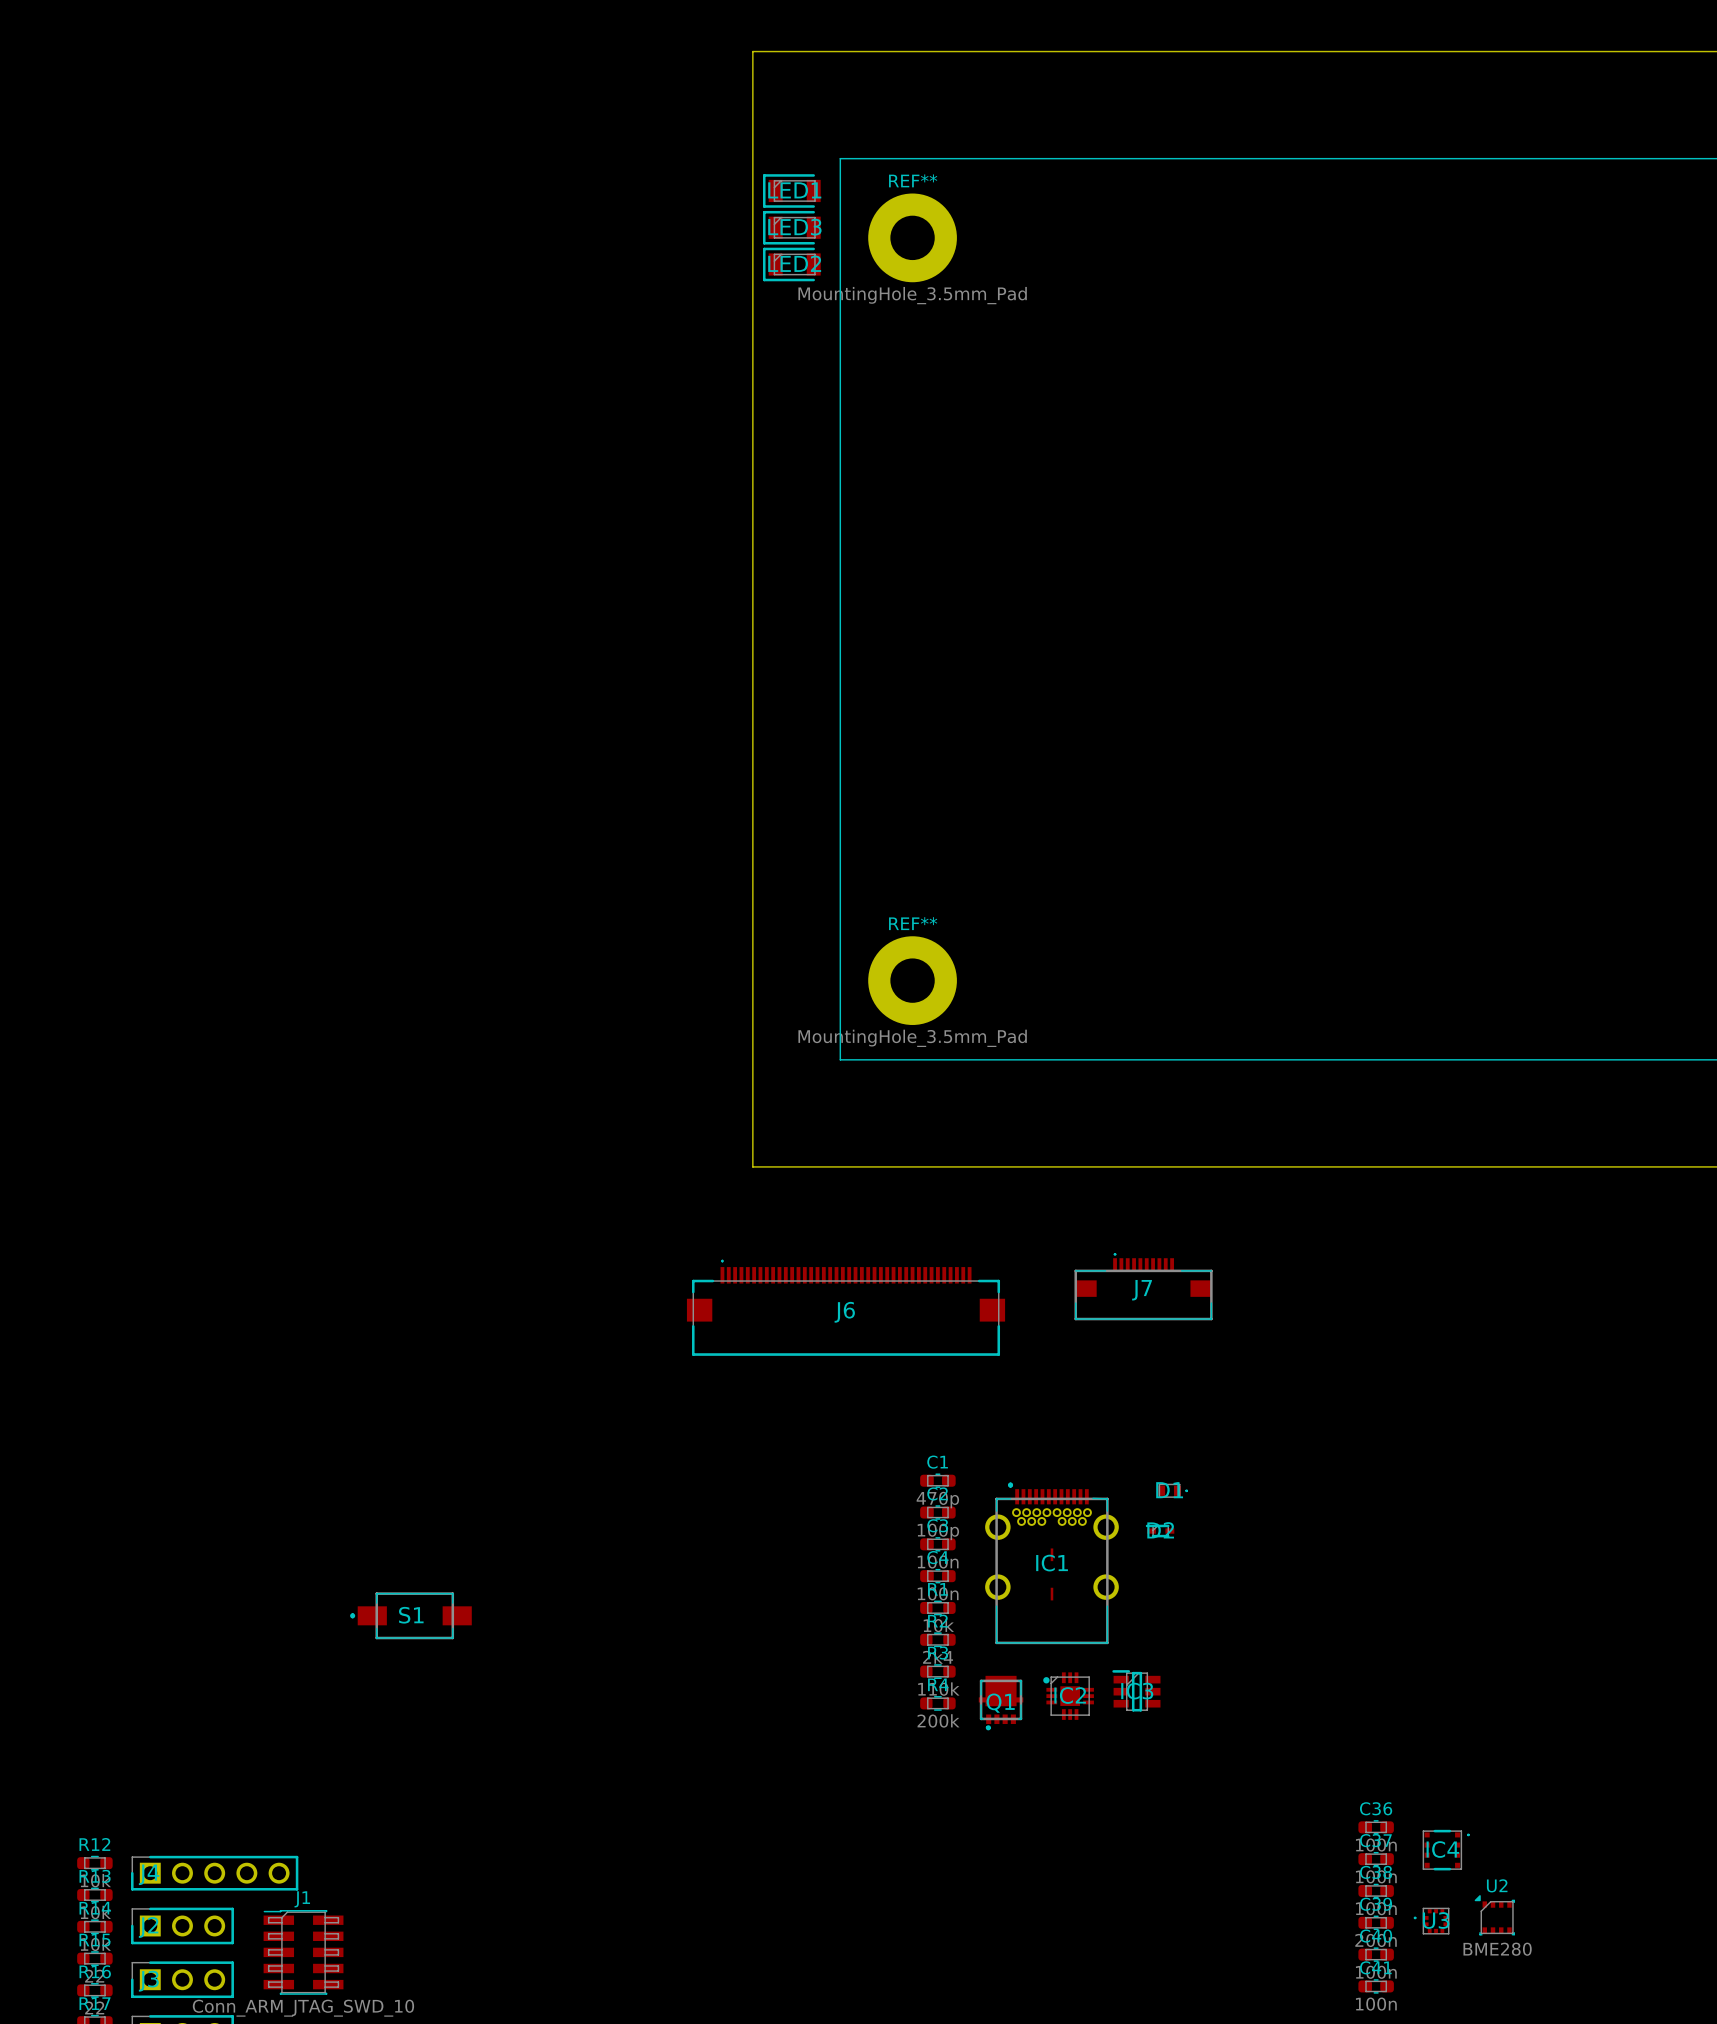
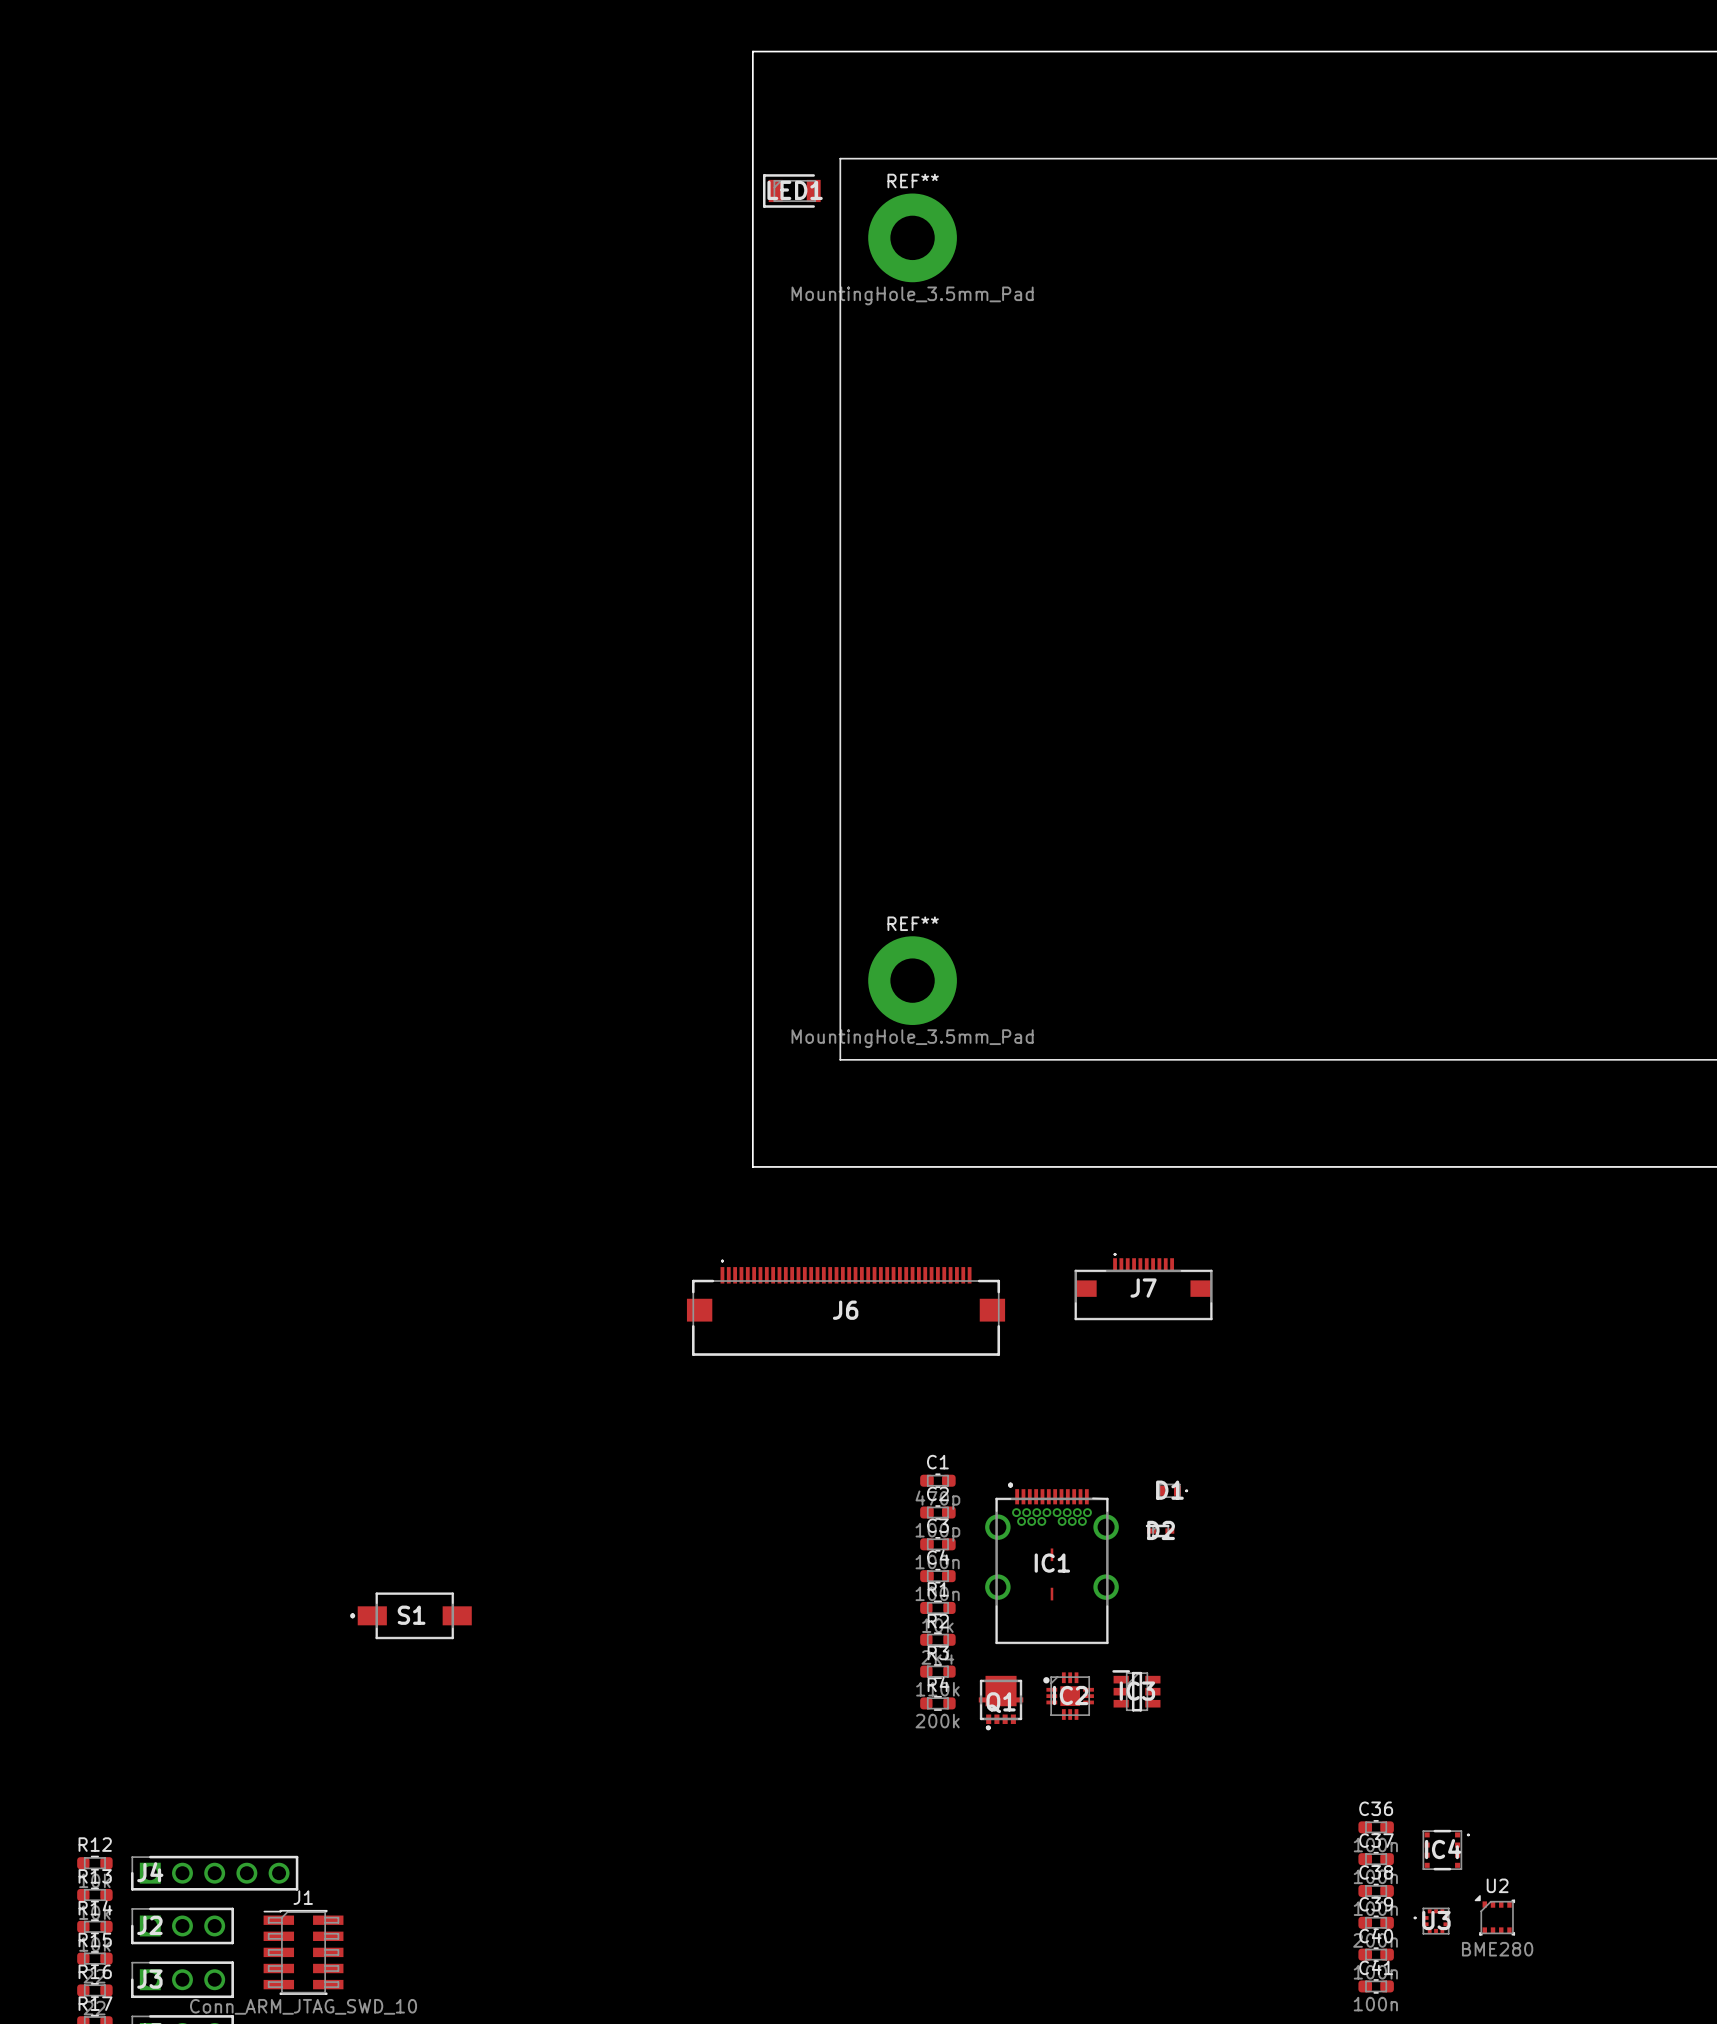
LED3: (791, 227) -> none
LED2: (791, 264) -> none

